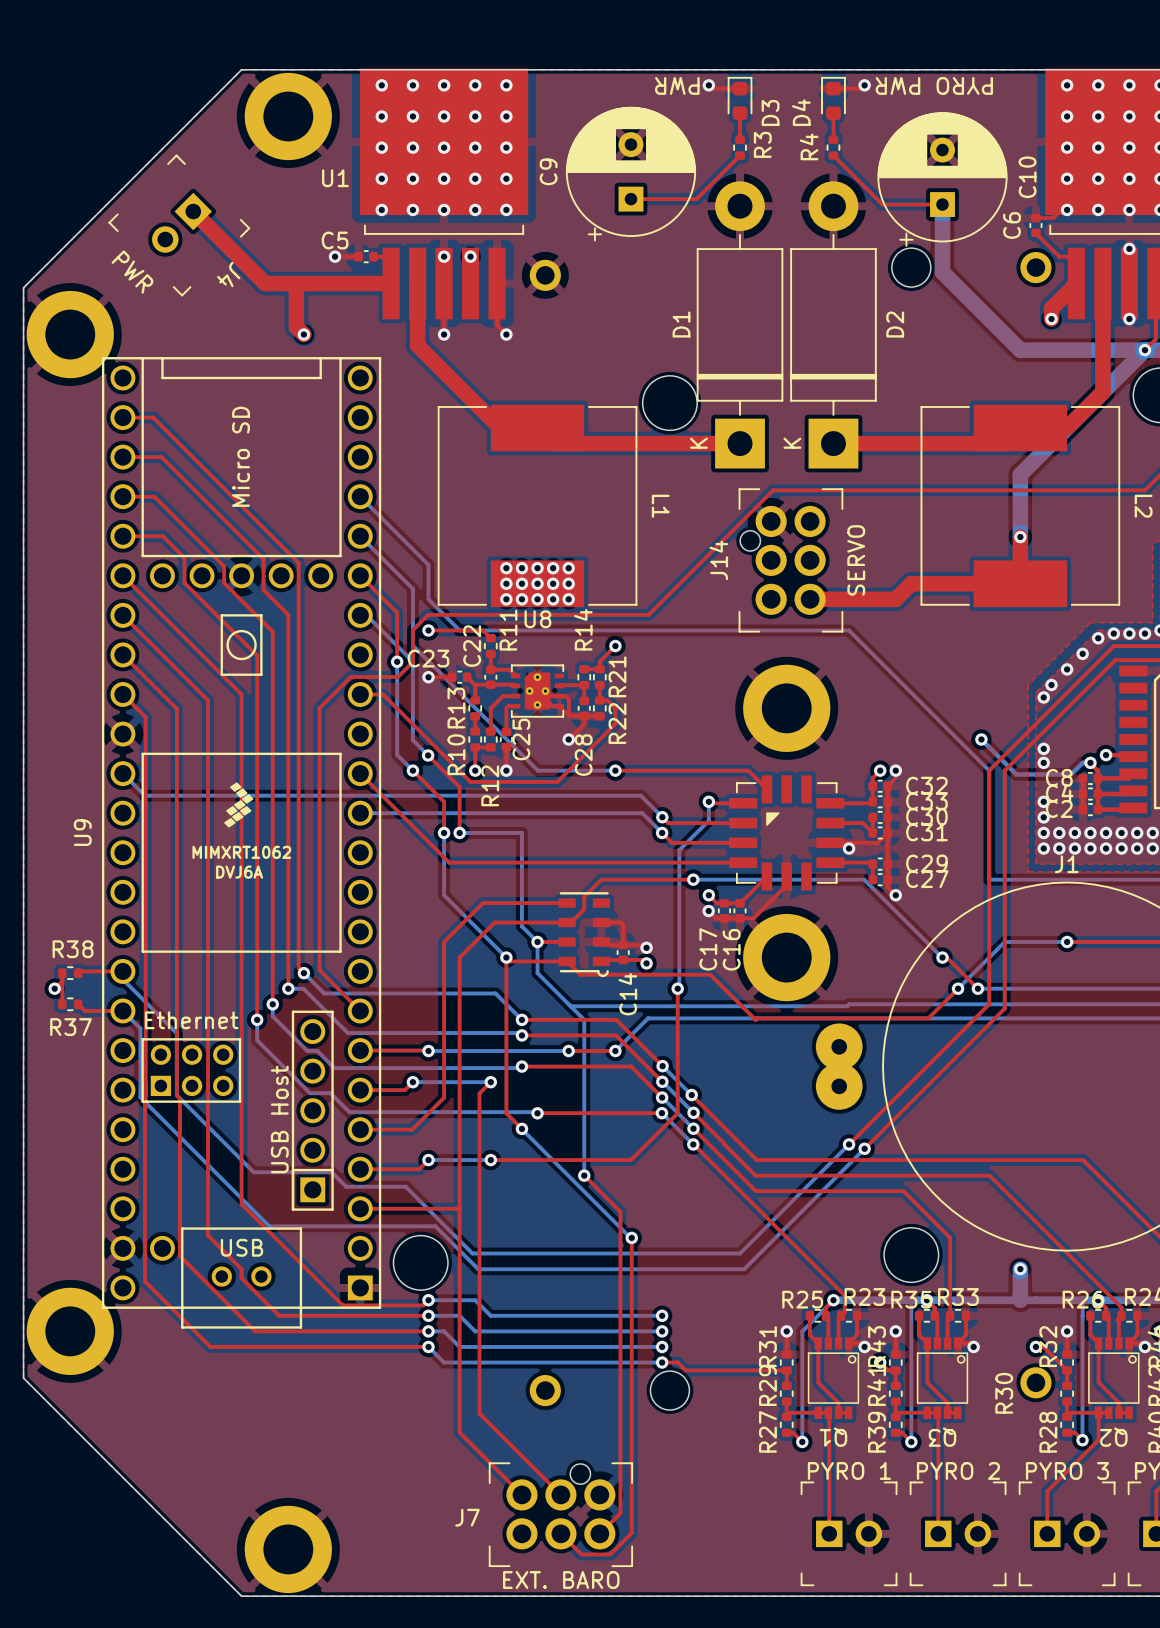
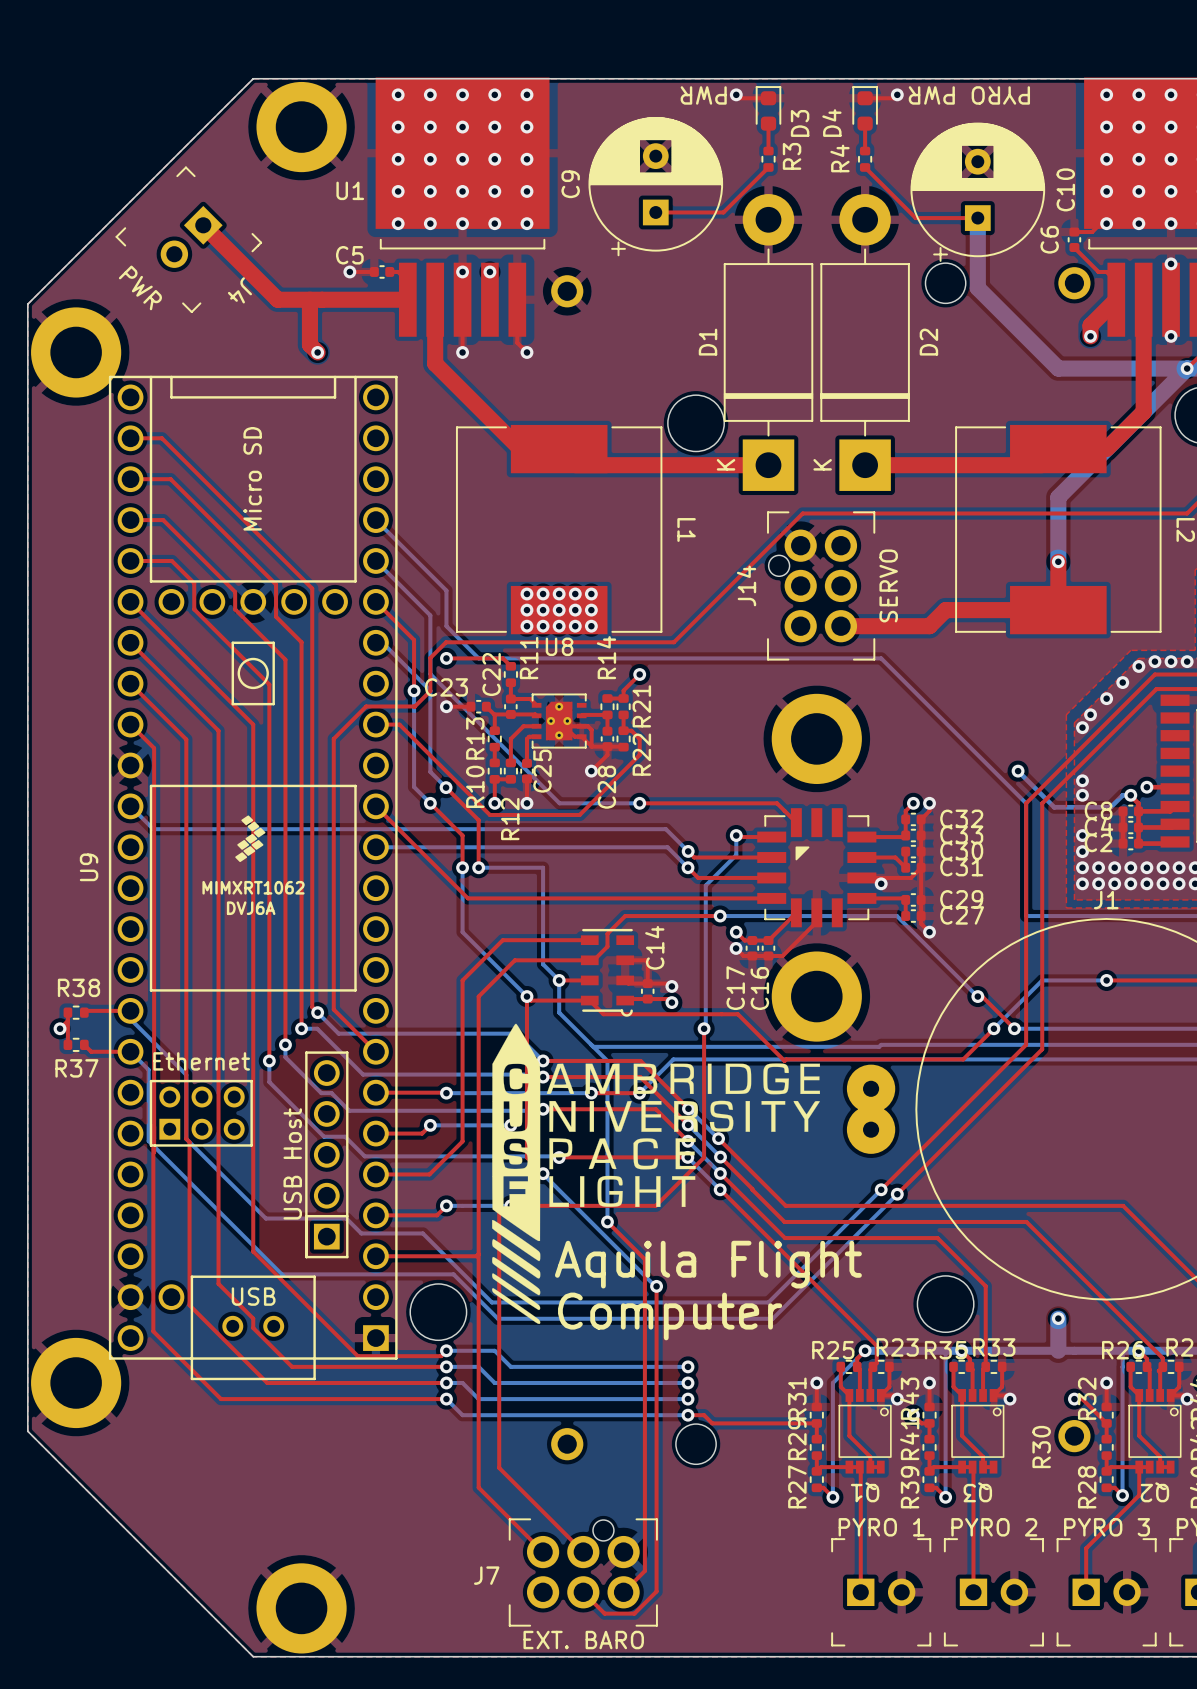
drawing: none -> [492, 1023, 820, 1325]
C14 name position: C14 (627, 994) -> C14 (654, 947)
text: none -> Aquila Flight (708, 1264)
text: none -> Computer (670, 1316)

